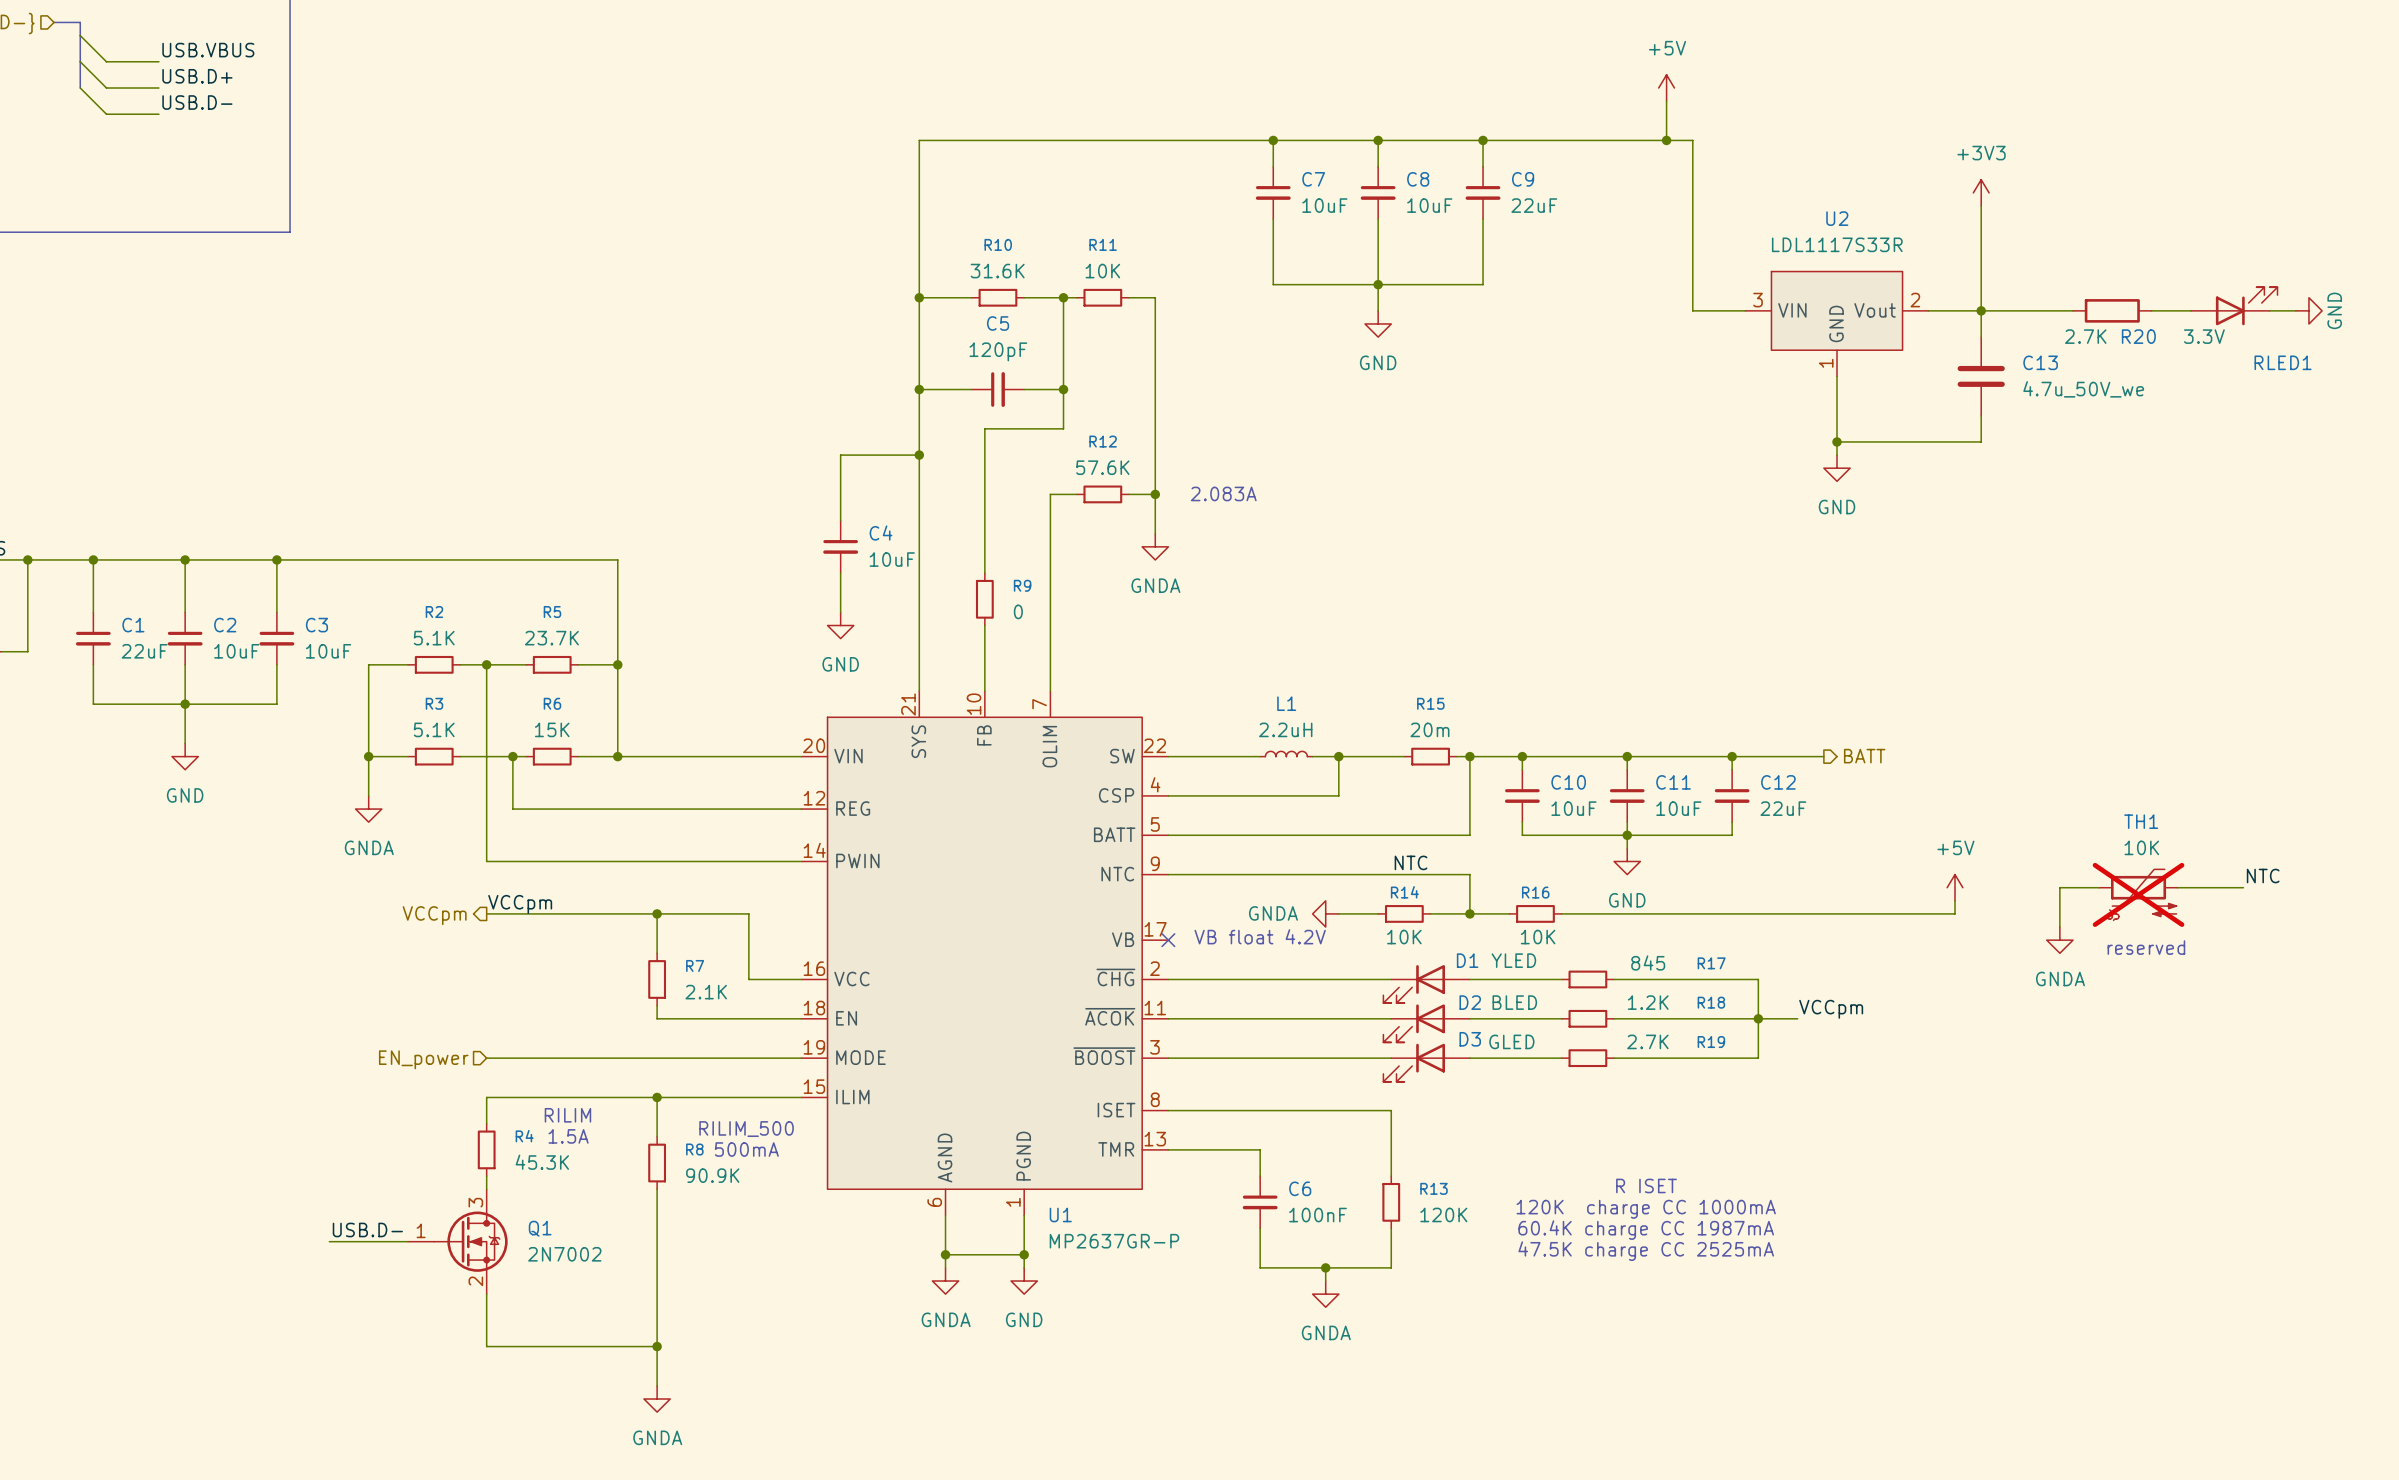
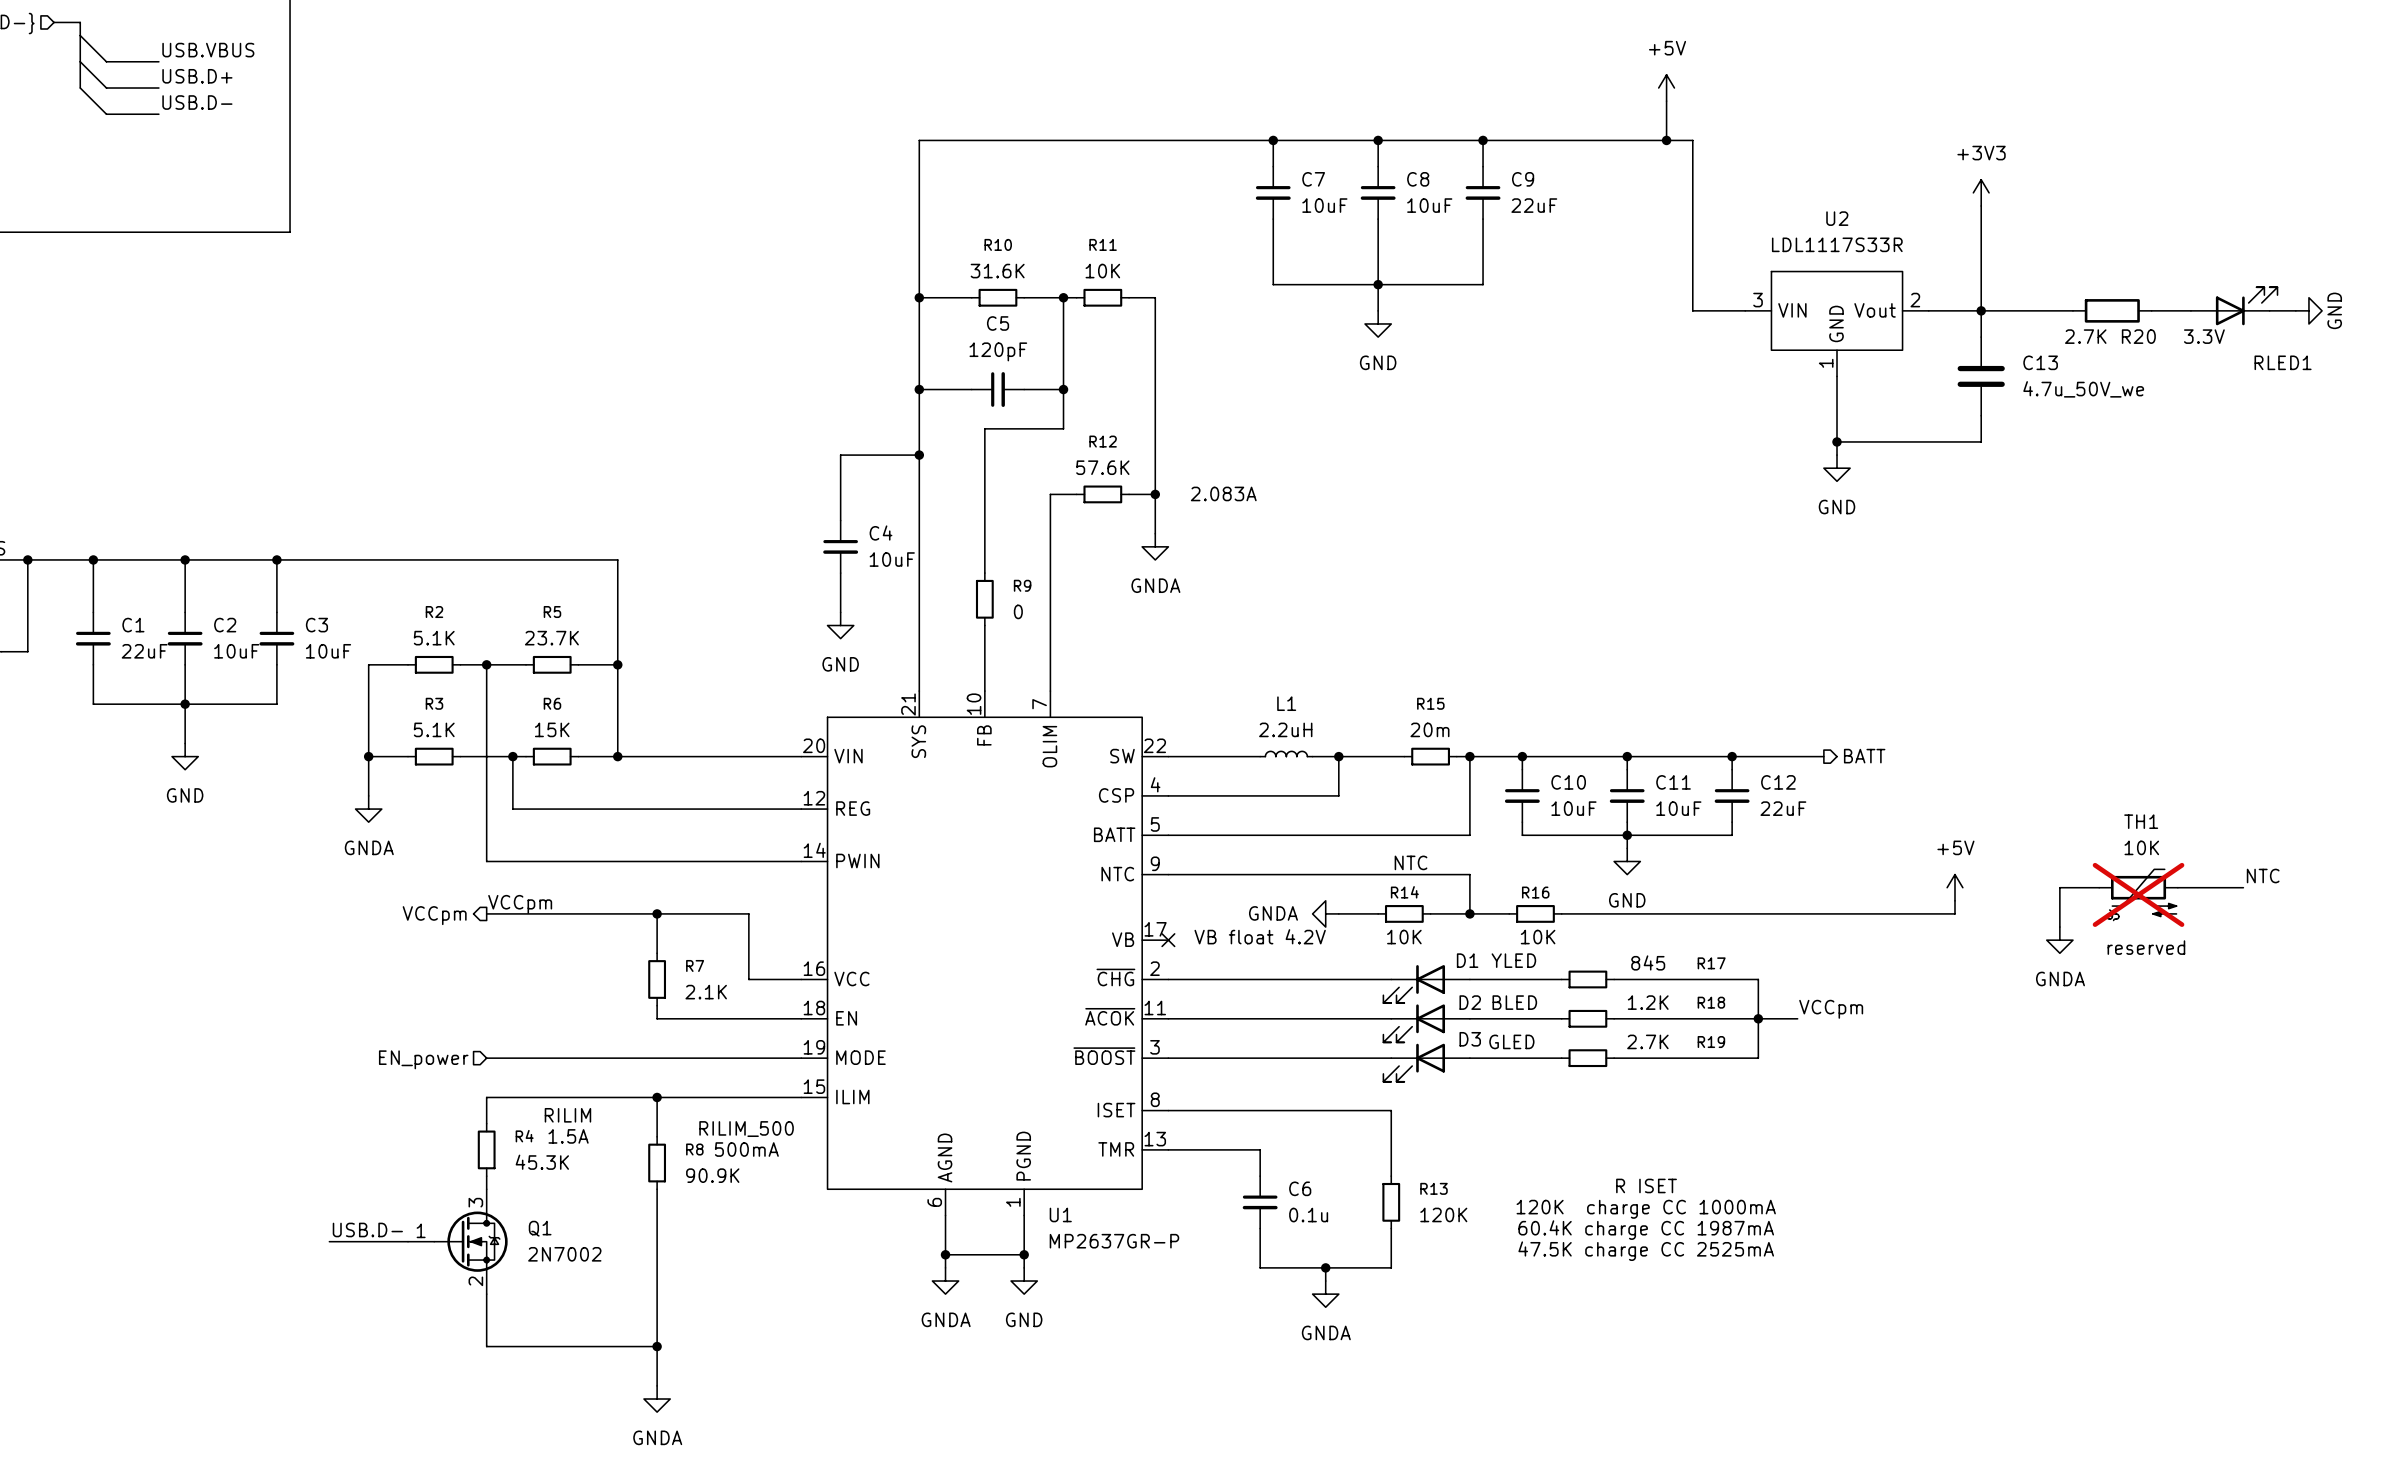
C6 value: 100nF (1318, 1215) -> 0.1u (1308, 1215)

